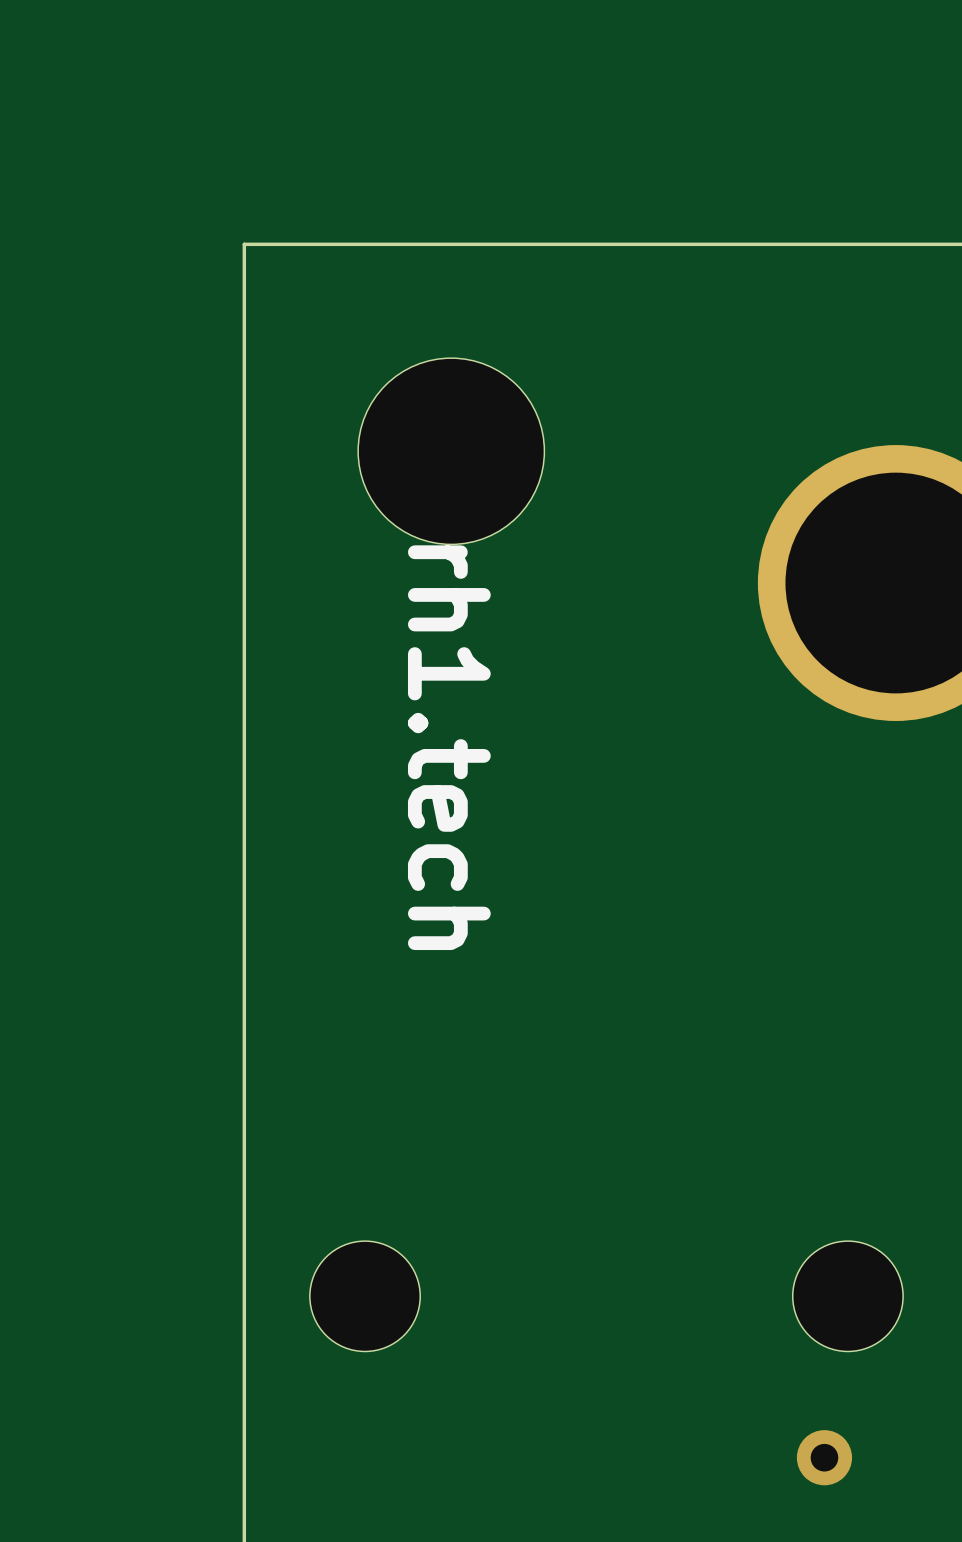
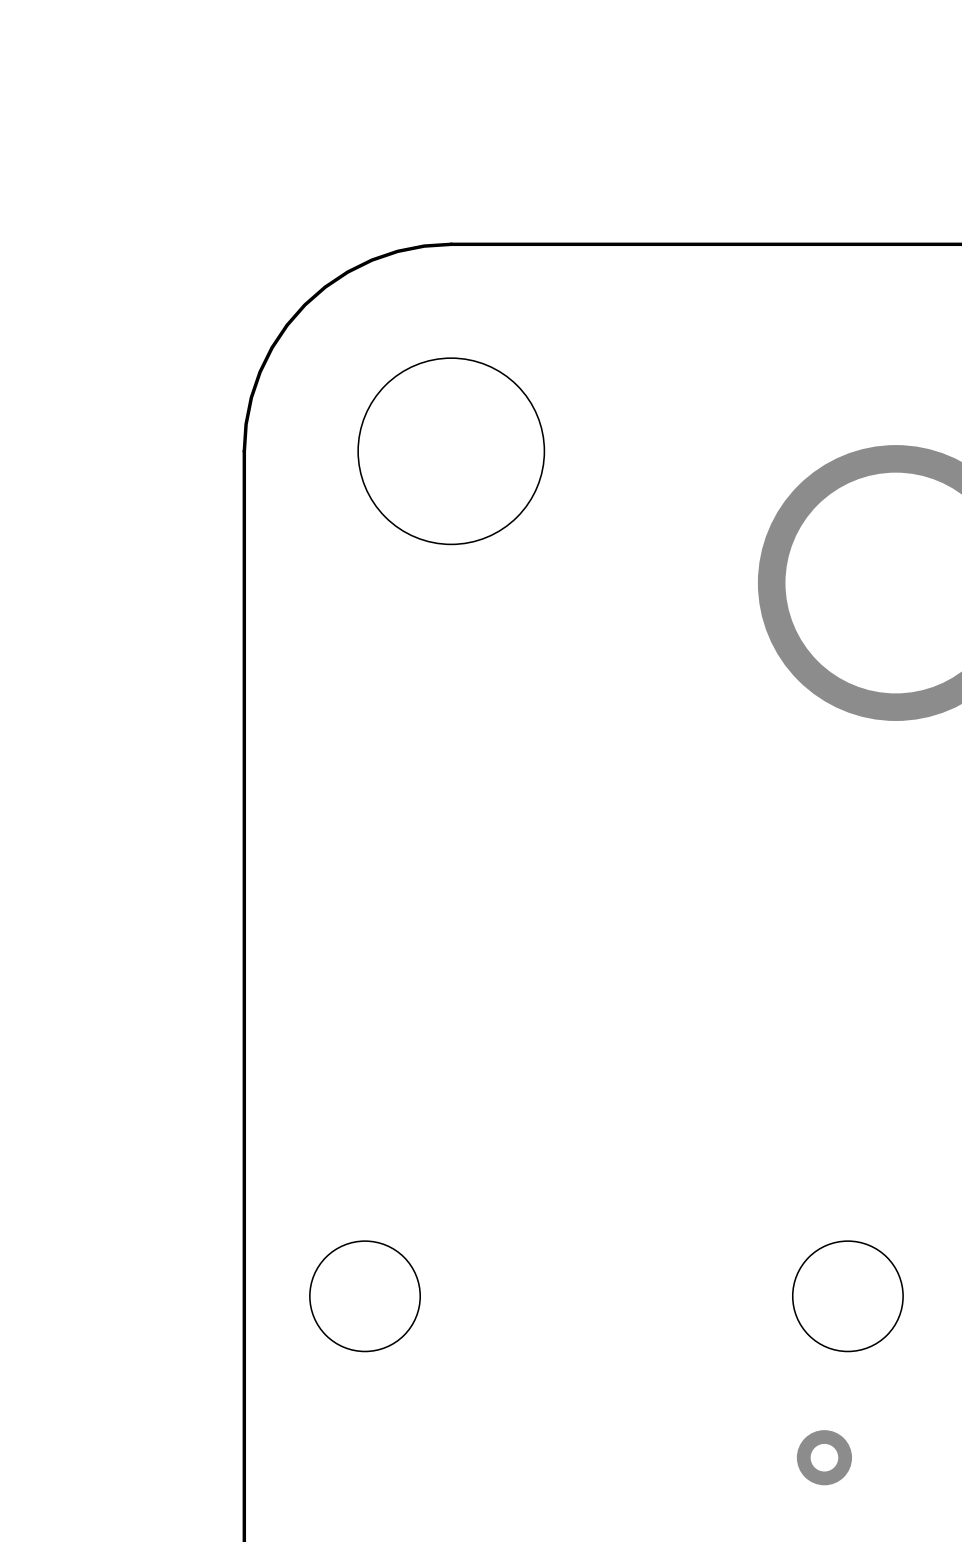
board edge: (451, 244) (244, 244) (244, 451) -> (451, 244) (424, 246) (397, 251) (372, 260) (347, 272) (325, 287) (304, 304) (287, 325) (272, 347) (260, 372) (251, 397) (246, 424) (244, 451)
text: rh1.tech (449, 747) -> none

